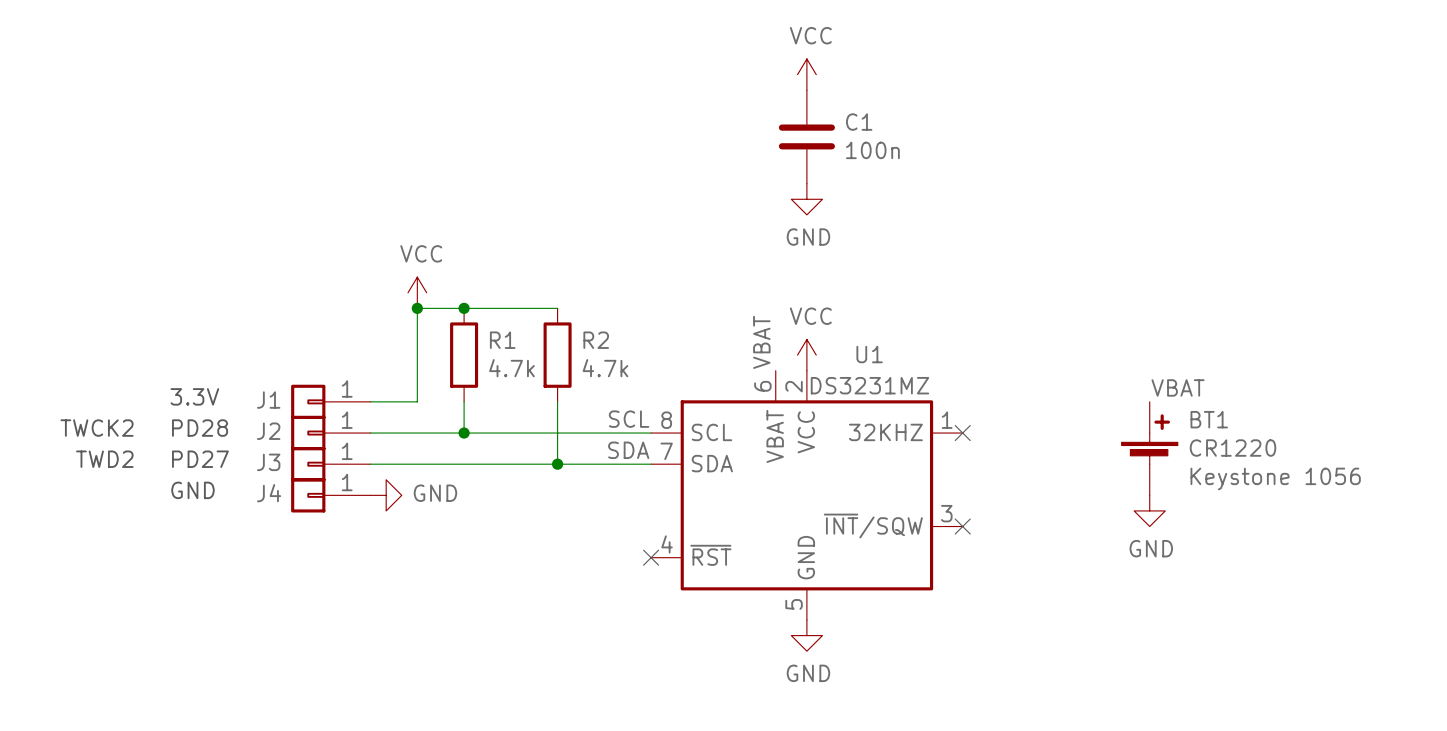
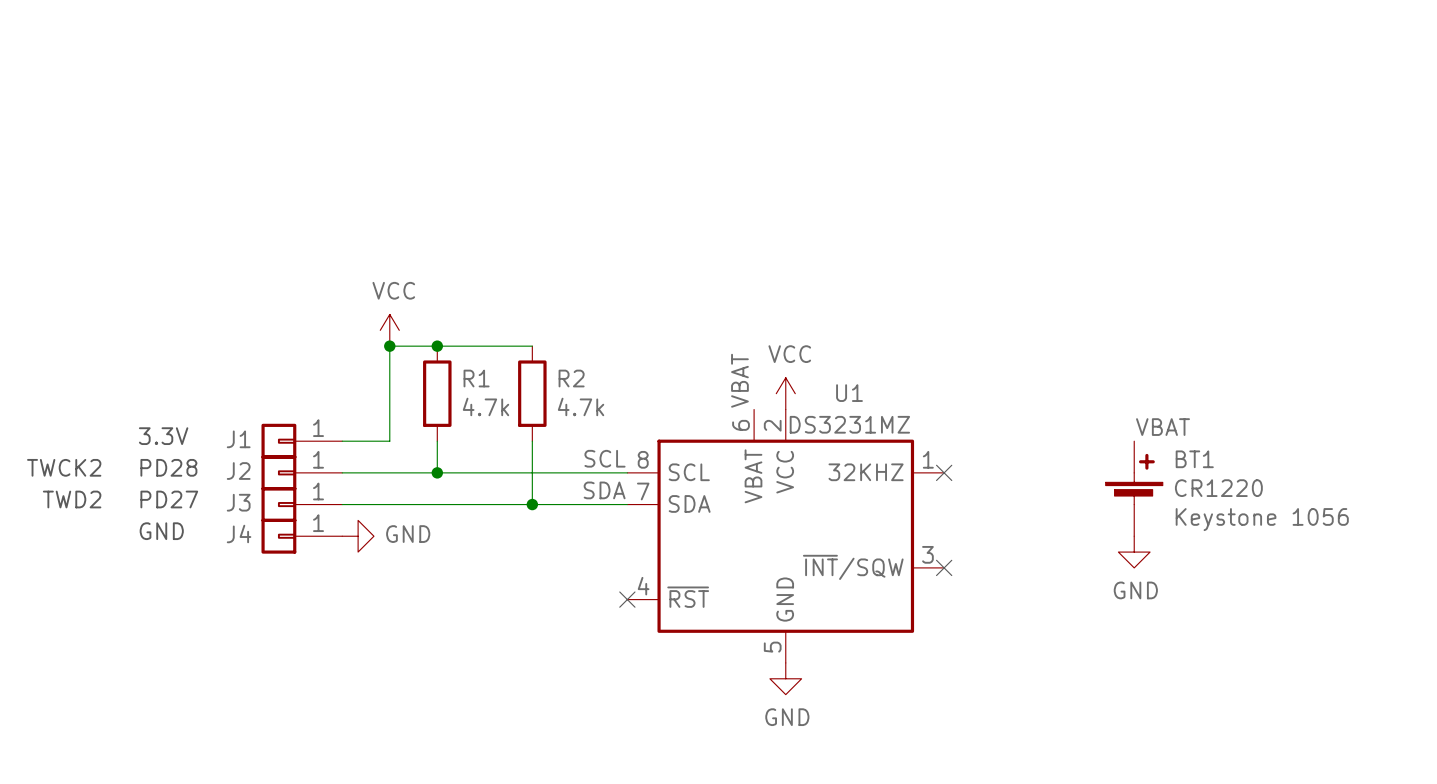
power symbol: VCC (806, 74) -> none
C1: 100n (806, 136) -> none
power symbol: GND (806, 199) -> none

